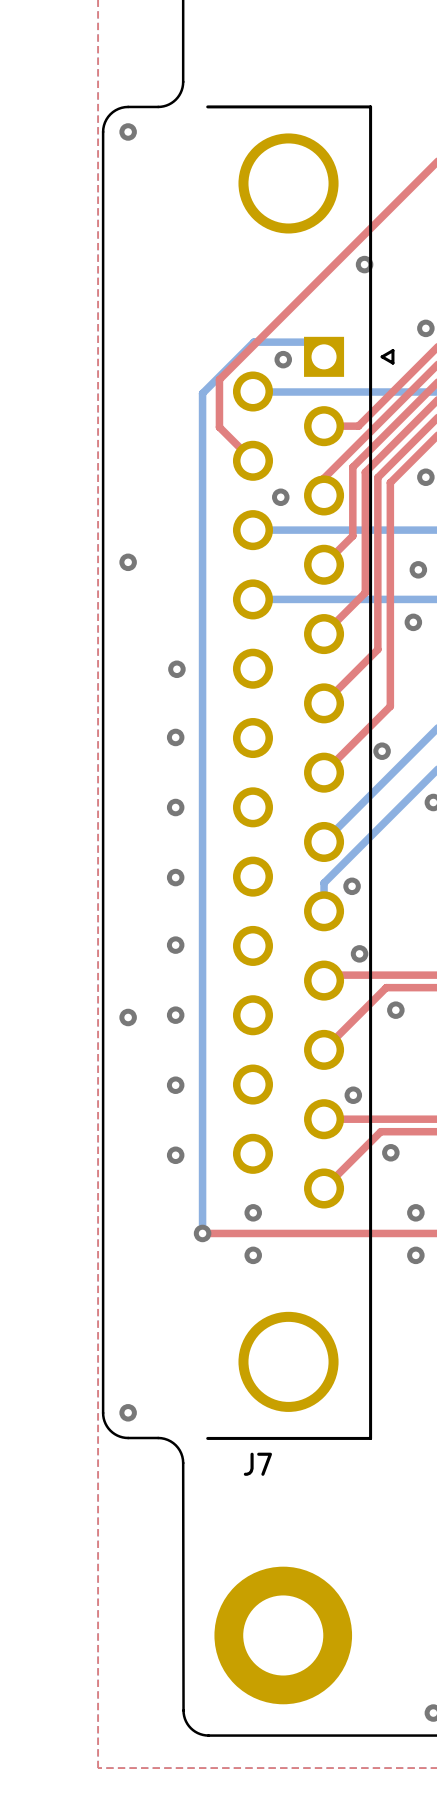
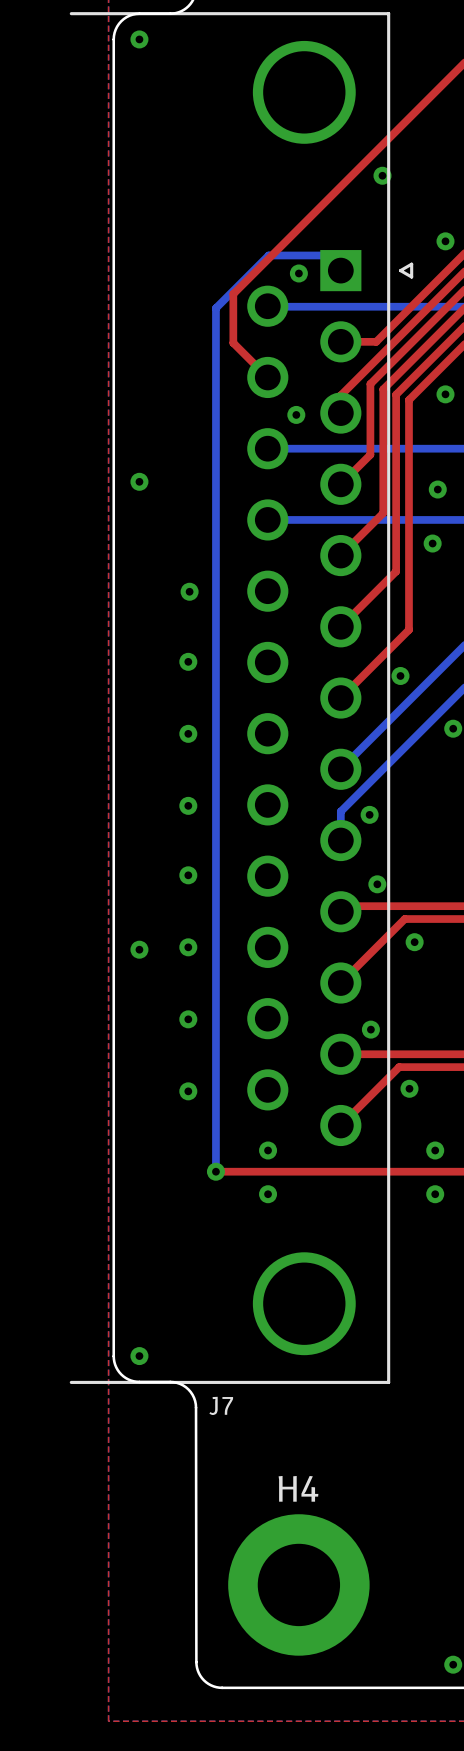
J7 footprint: [206, 105, 395, 1440] -> [69, 12, 414, 1384]
H4 name: none -> H4 (298, 1488)

